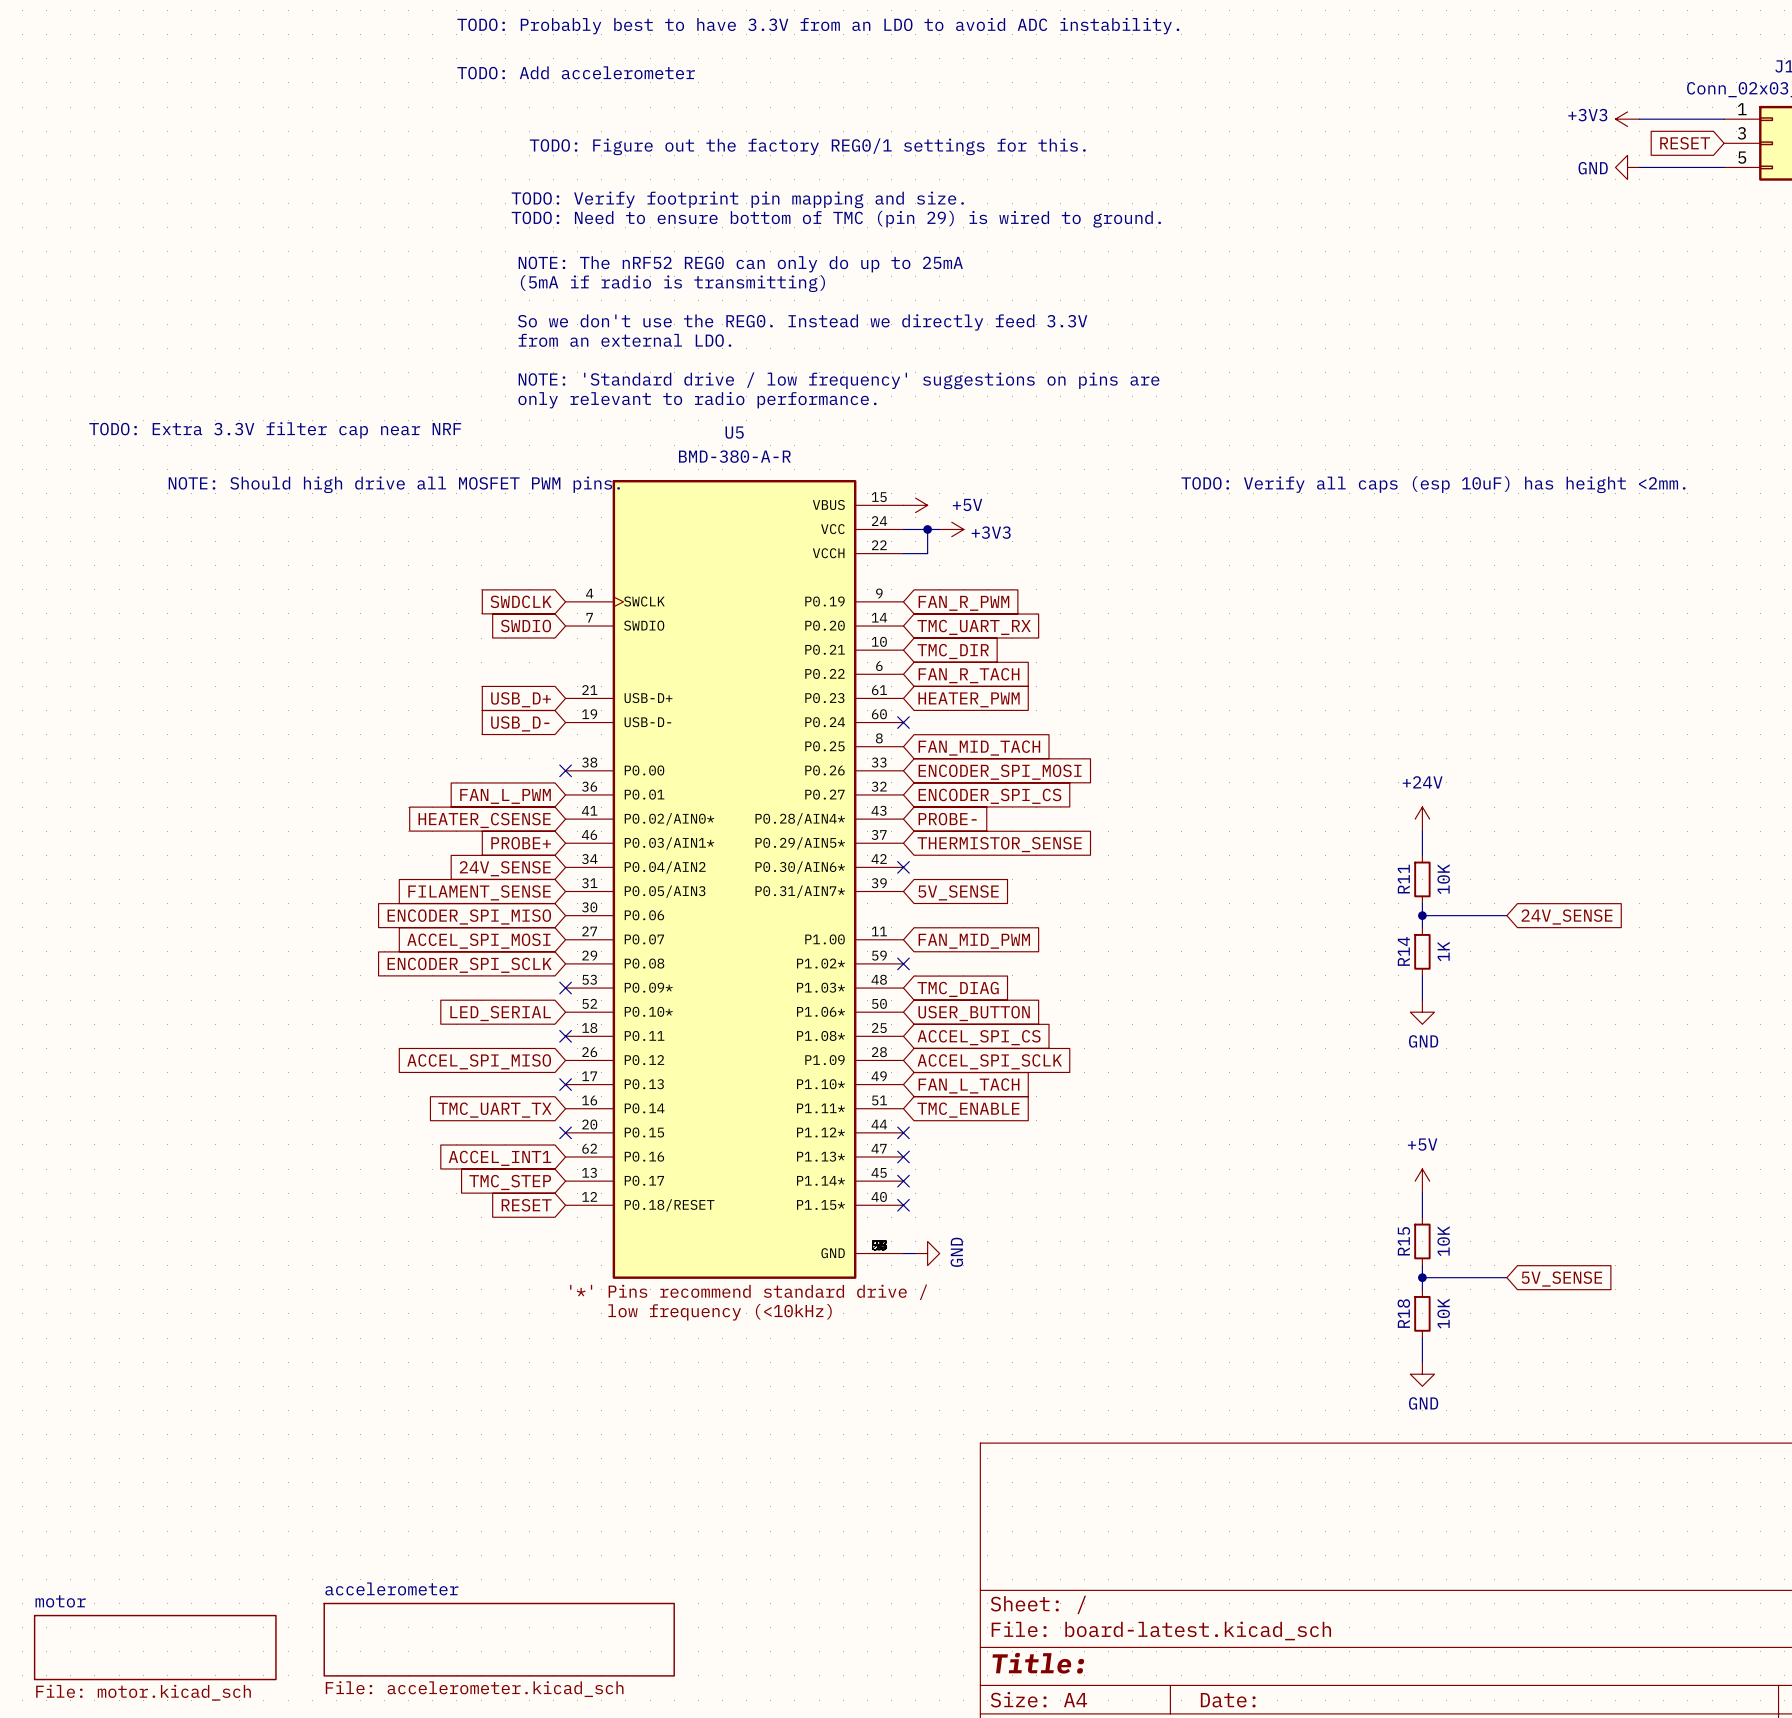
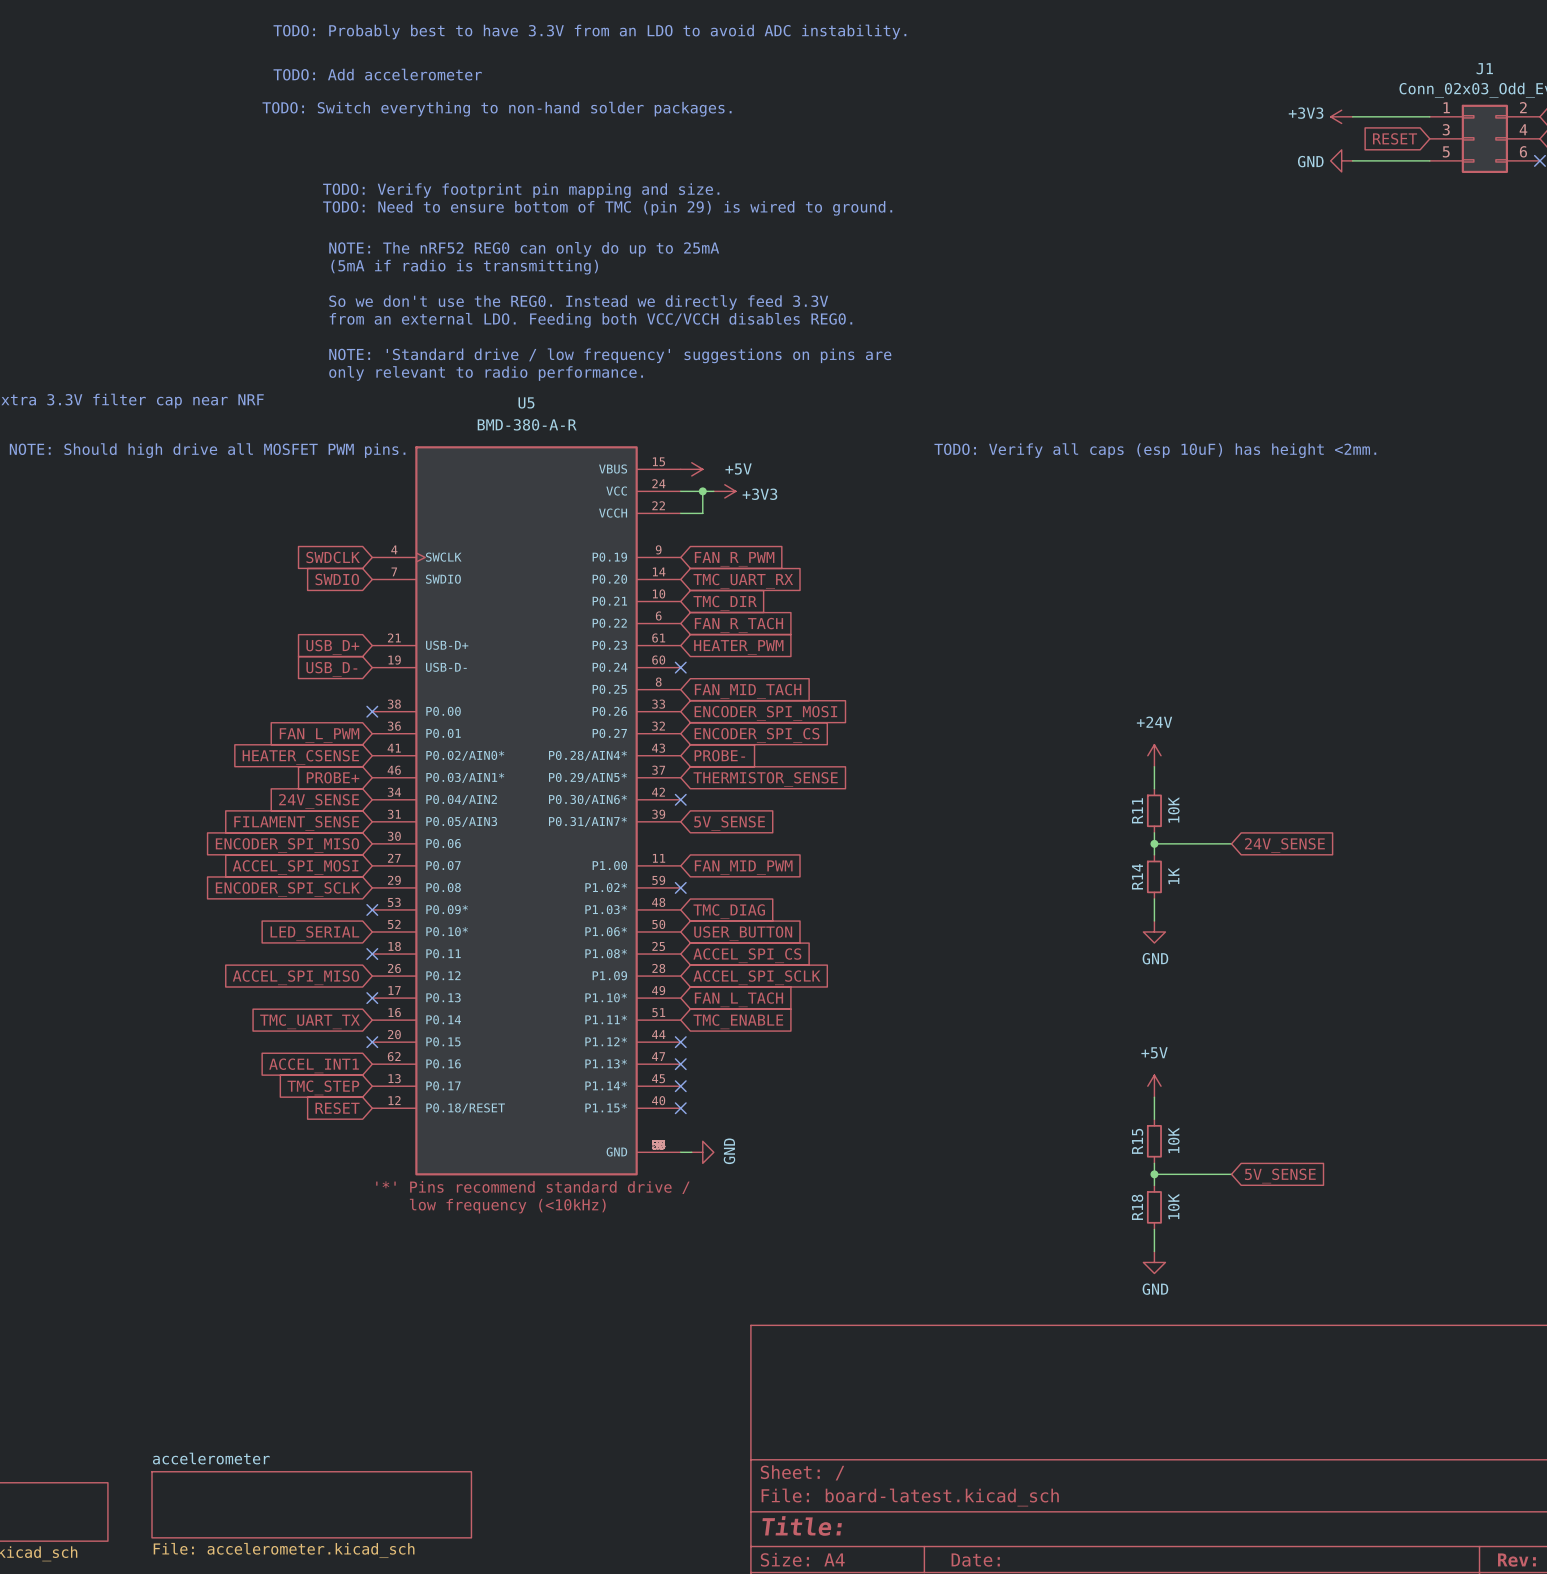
text: none -> TODO: Switch everything to non-hand solder packages. (497, 109)
text: TODO: Figure out the factory REG0/1 settings for this. (807, 146) -> none
text: from an external LDO. (624, 340) -> from an external LDO. Feeding both VCC/VCCH disables REG0. (590, 320)

